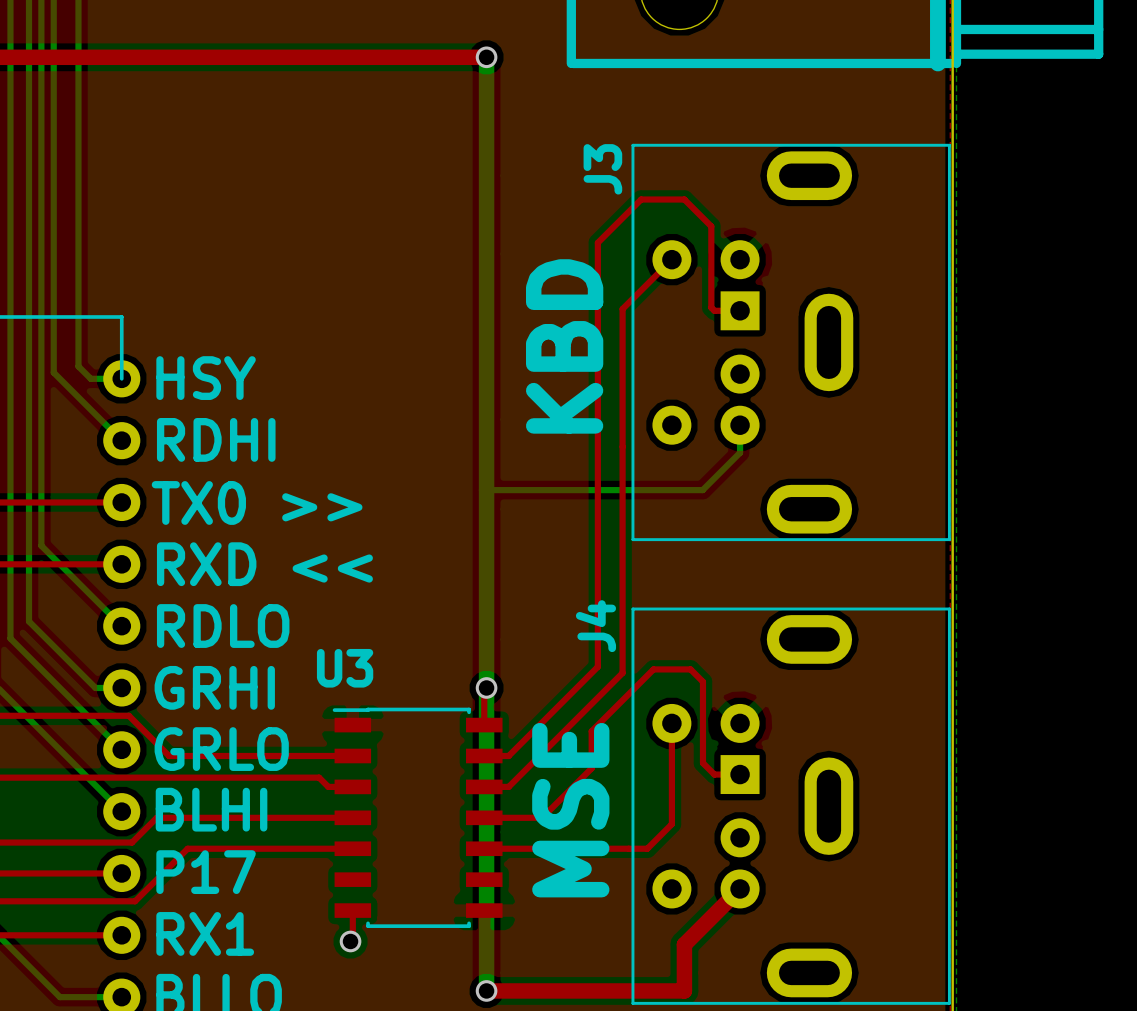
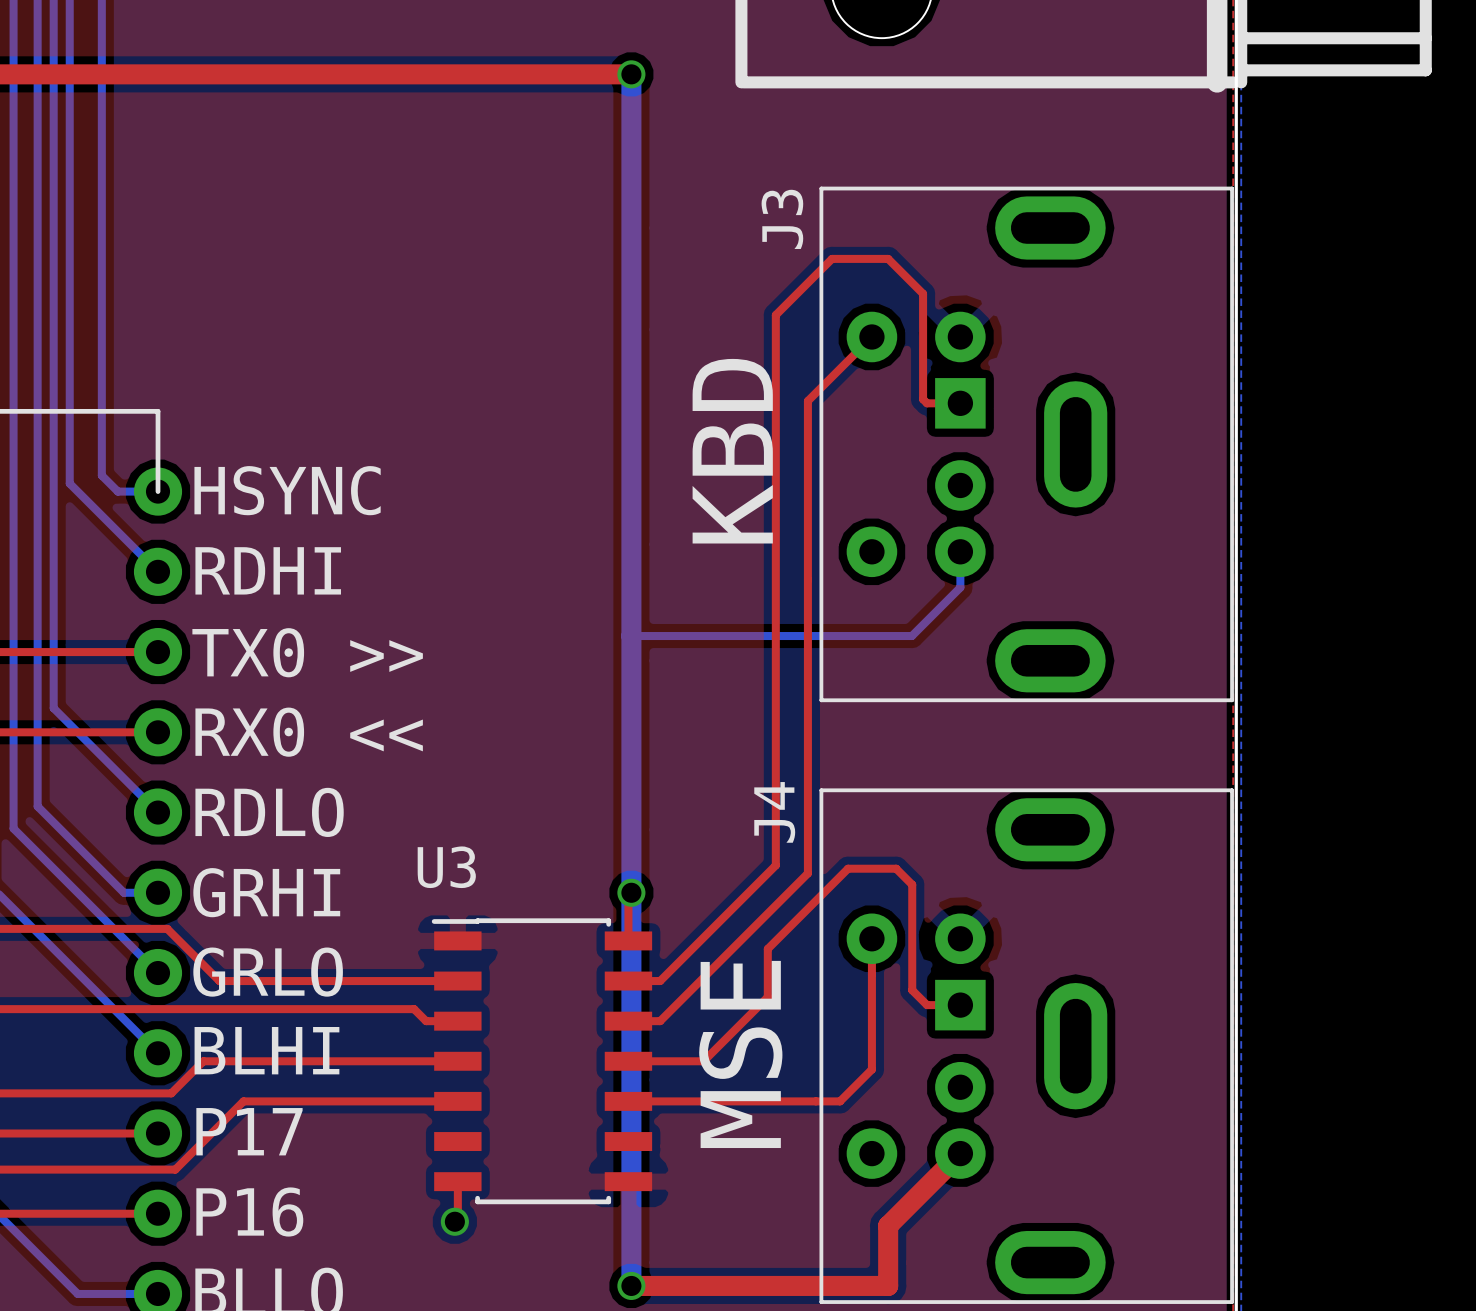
text: HSY (206, 378) -> HSYNC (287, 490)
text: RXD << (264, 564) -> RX0 << (309, 732)
text: RX1 (205, 933) -> P16 (249, 1212)

